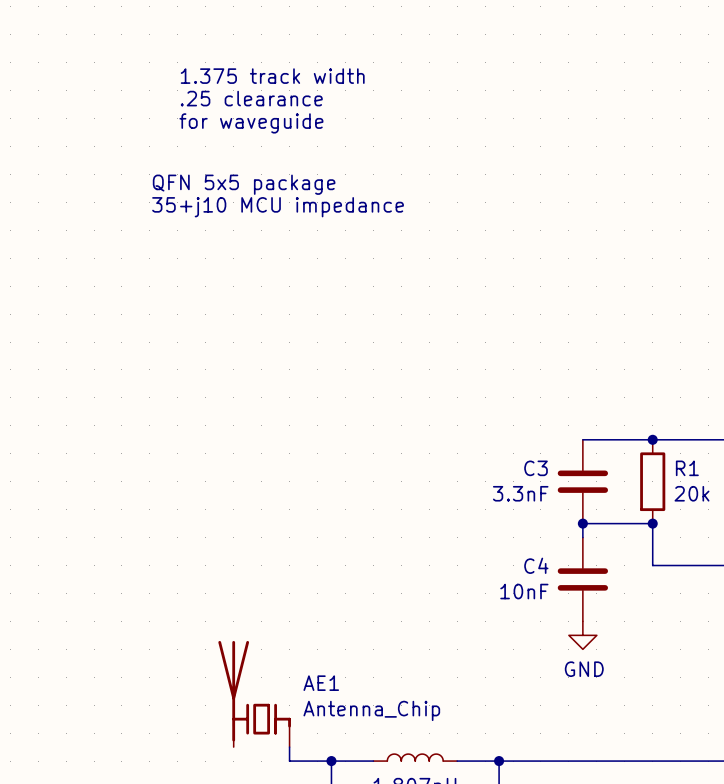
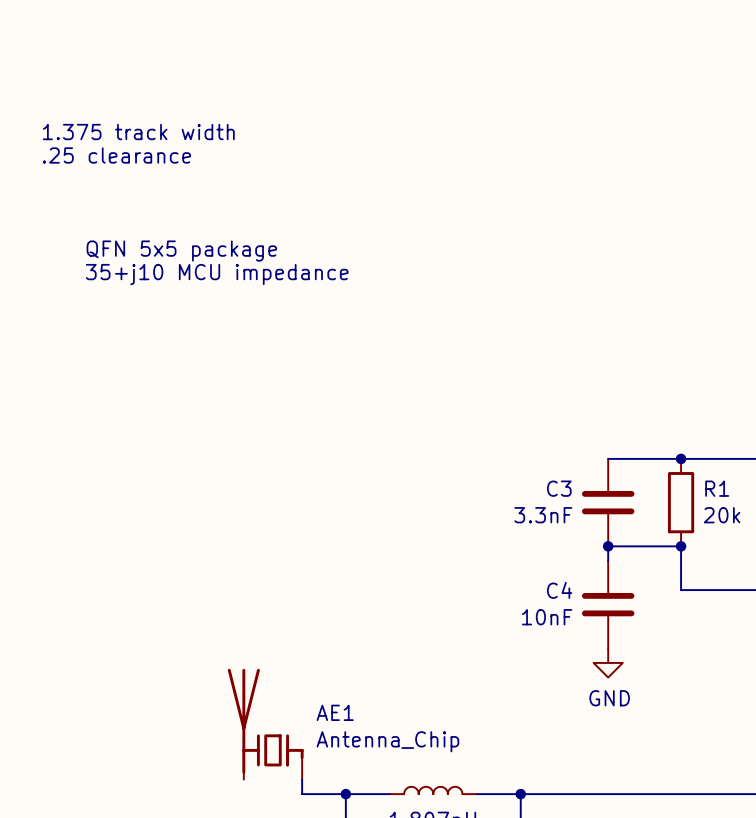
text position: 1.375 track width (272, 76) -> 1.375 track width (138, 132)
text position: .25 clearance (251, 98) -> .25 clearance (116, 155)
text: for waveguide (251, 123) -> none
text position: QFN 5x5 package (244, 184) -> QFN 5x5 package (181, 251)
text position: 35+j10 MCU impedance (278, 207) -> 35+j10 MCU impedance (217, 274)

